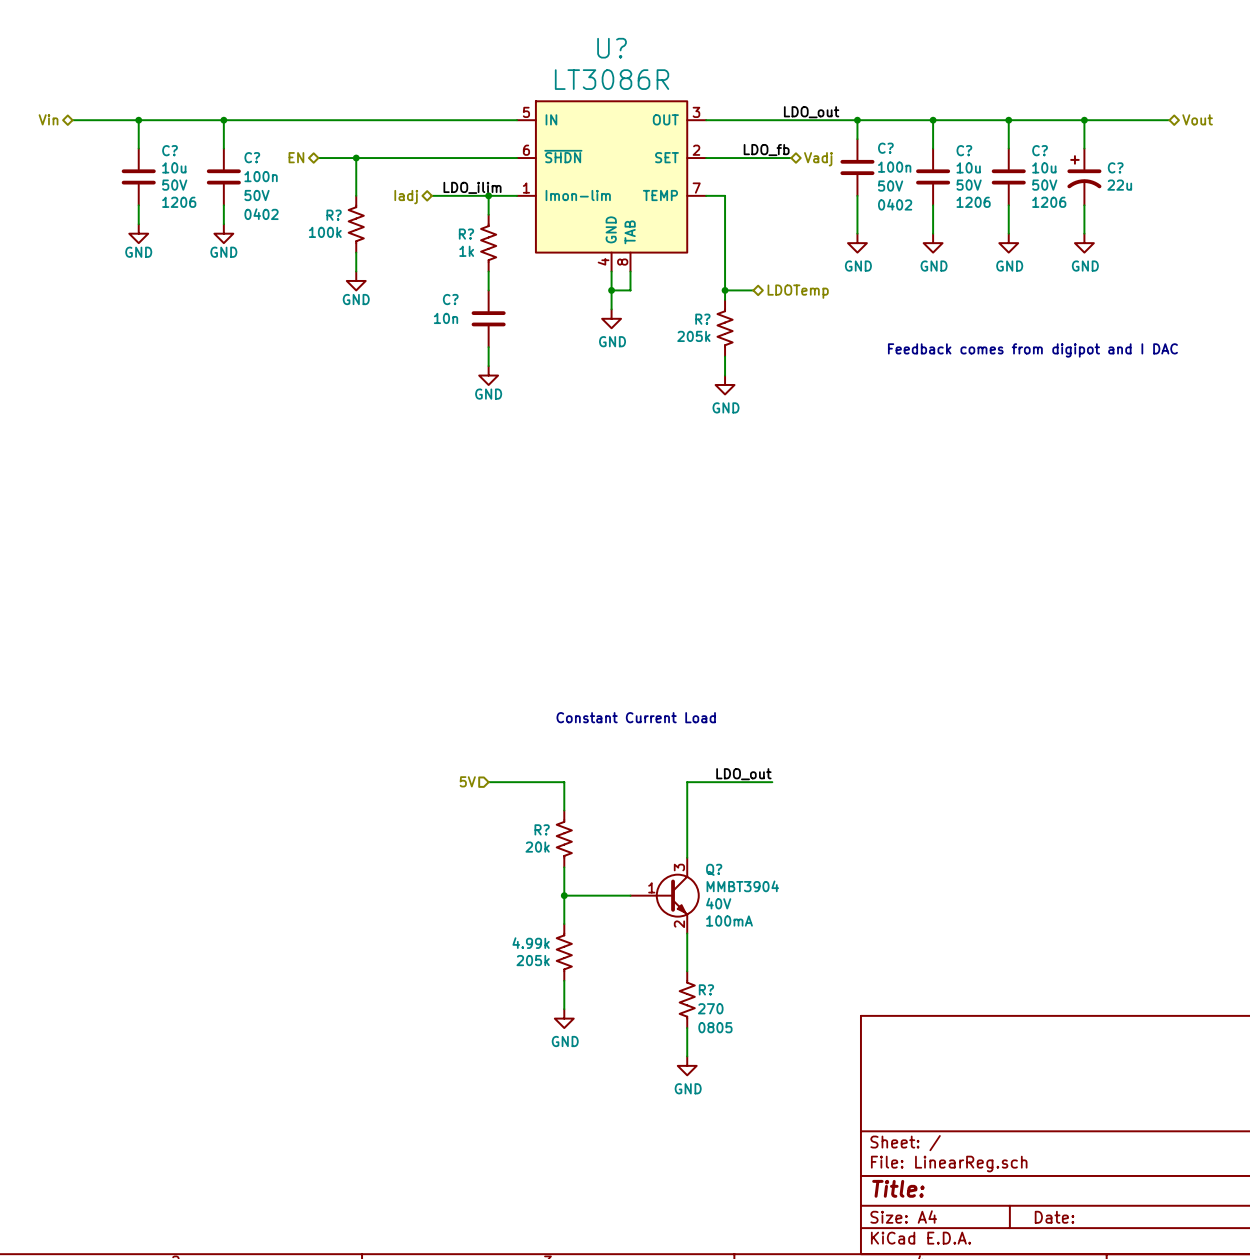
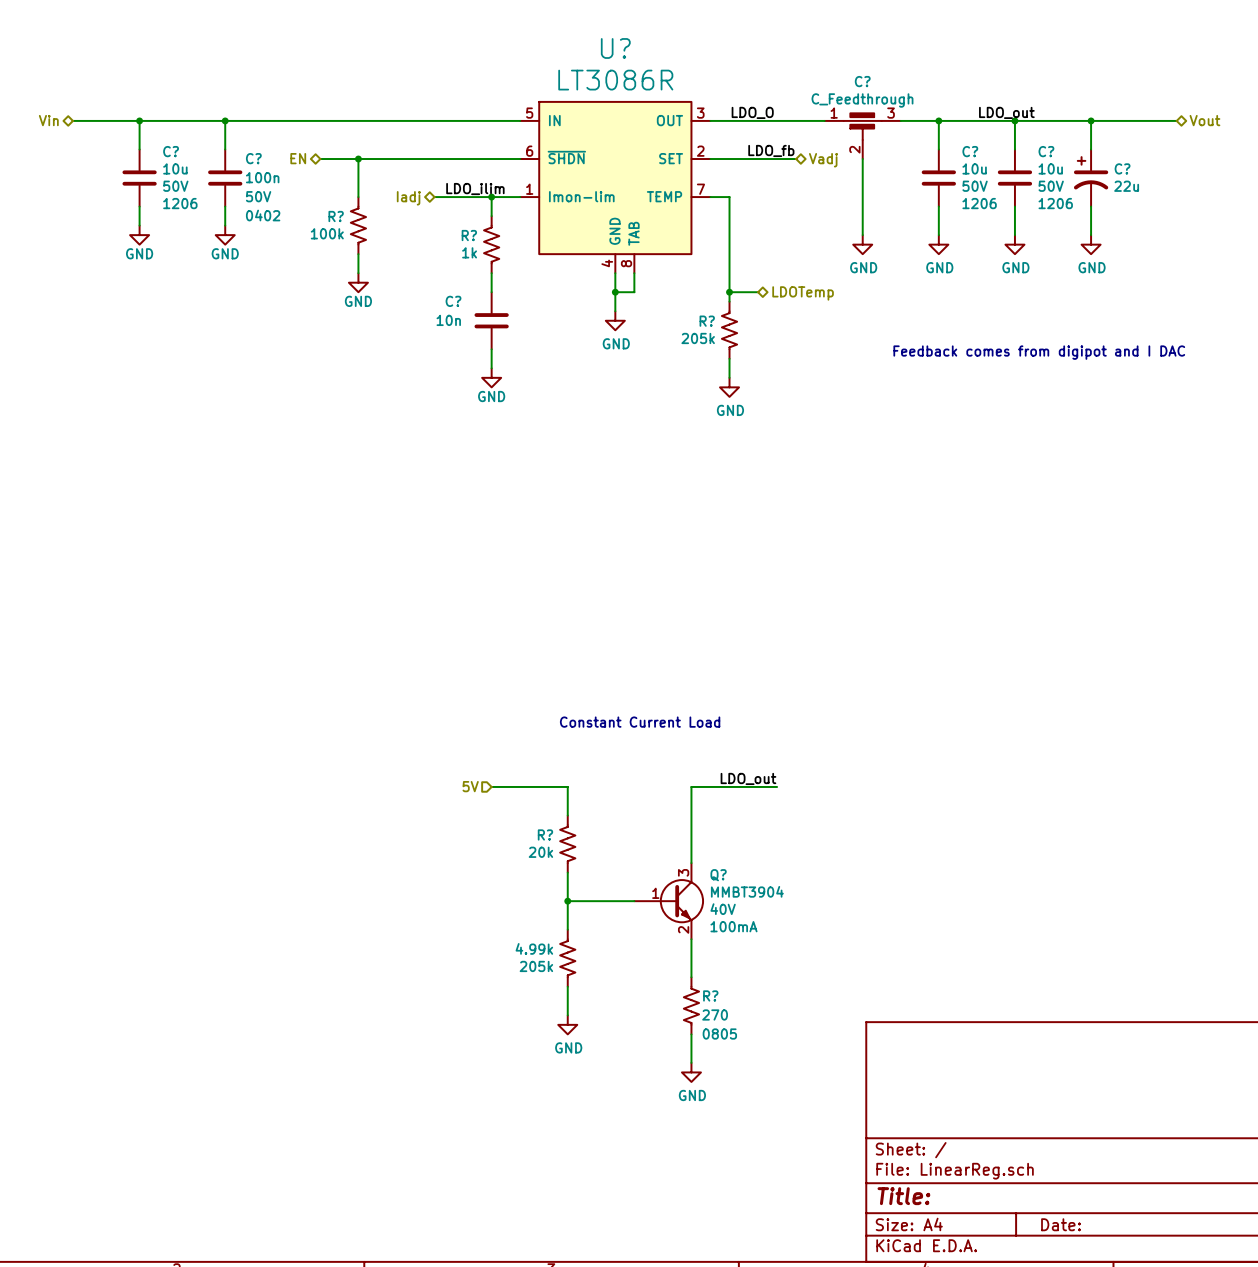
label: none -> LDO_O (752, 112)
label: LDO_out (811, 112) -> none
label: none -> LDO_out (1006, 112)
junction: (857, 120) -> none
C?: none -> C_Feedthrough (862, 136)
C?: 100n (857, 167) -> none

